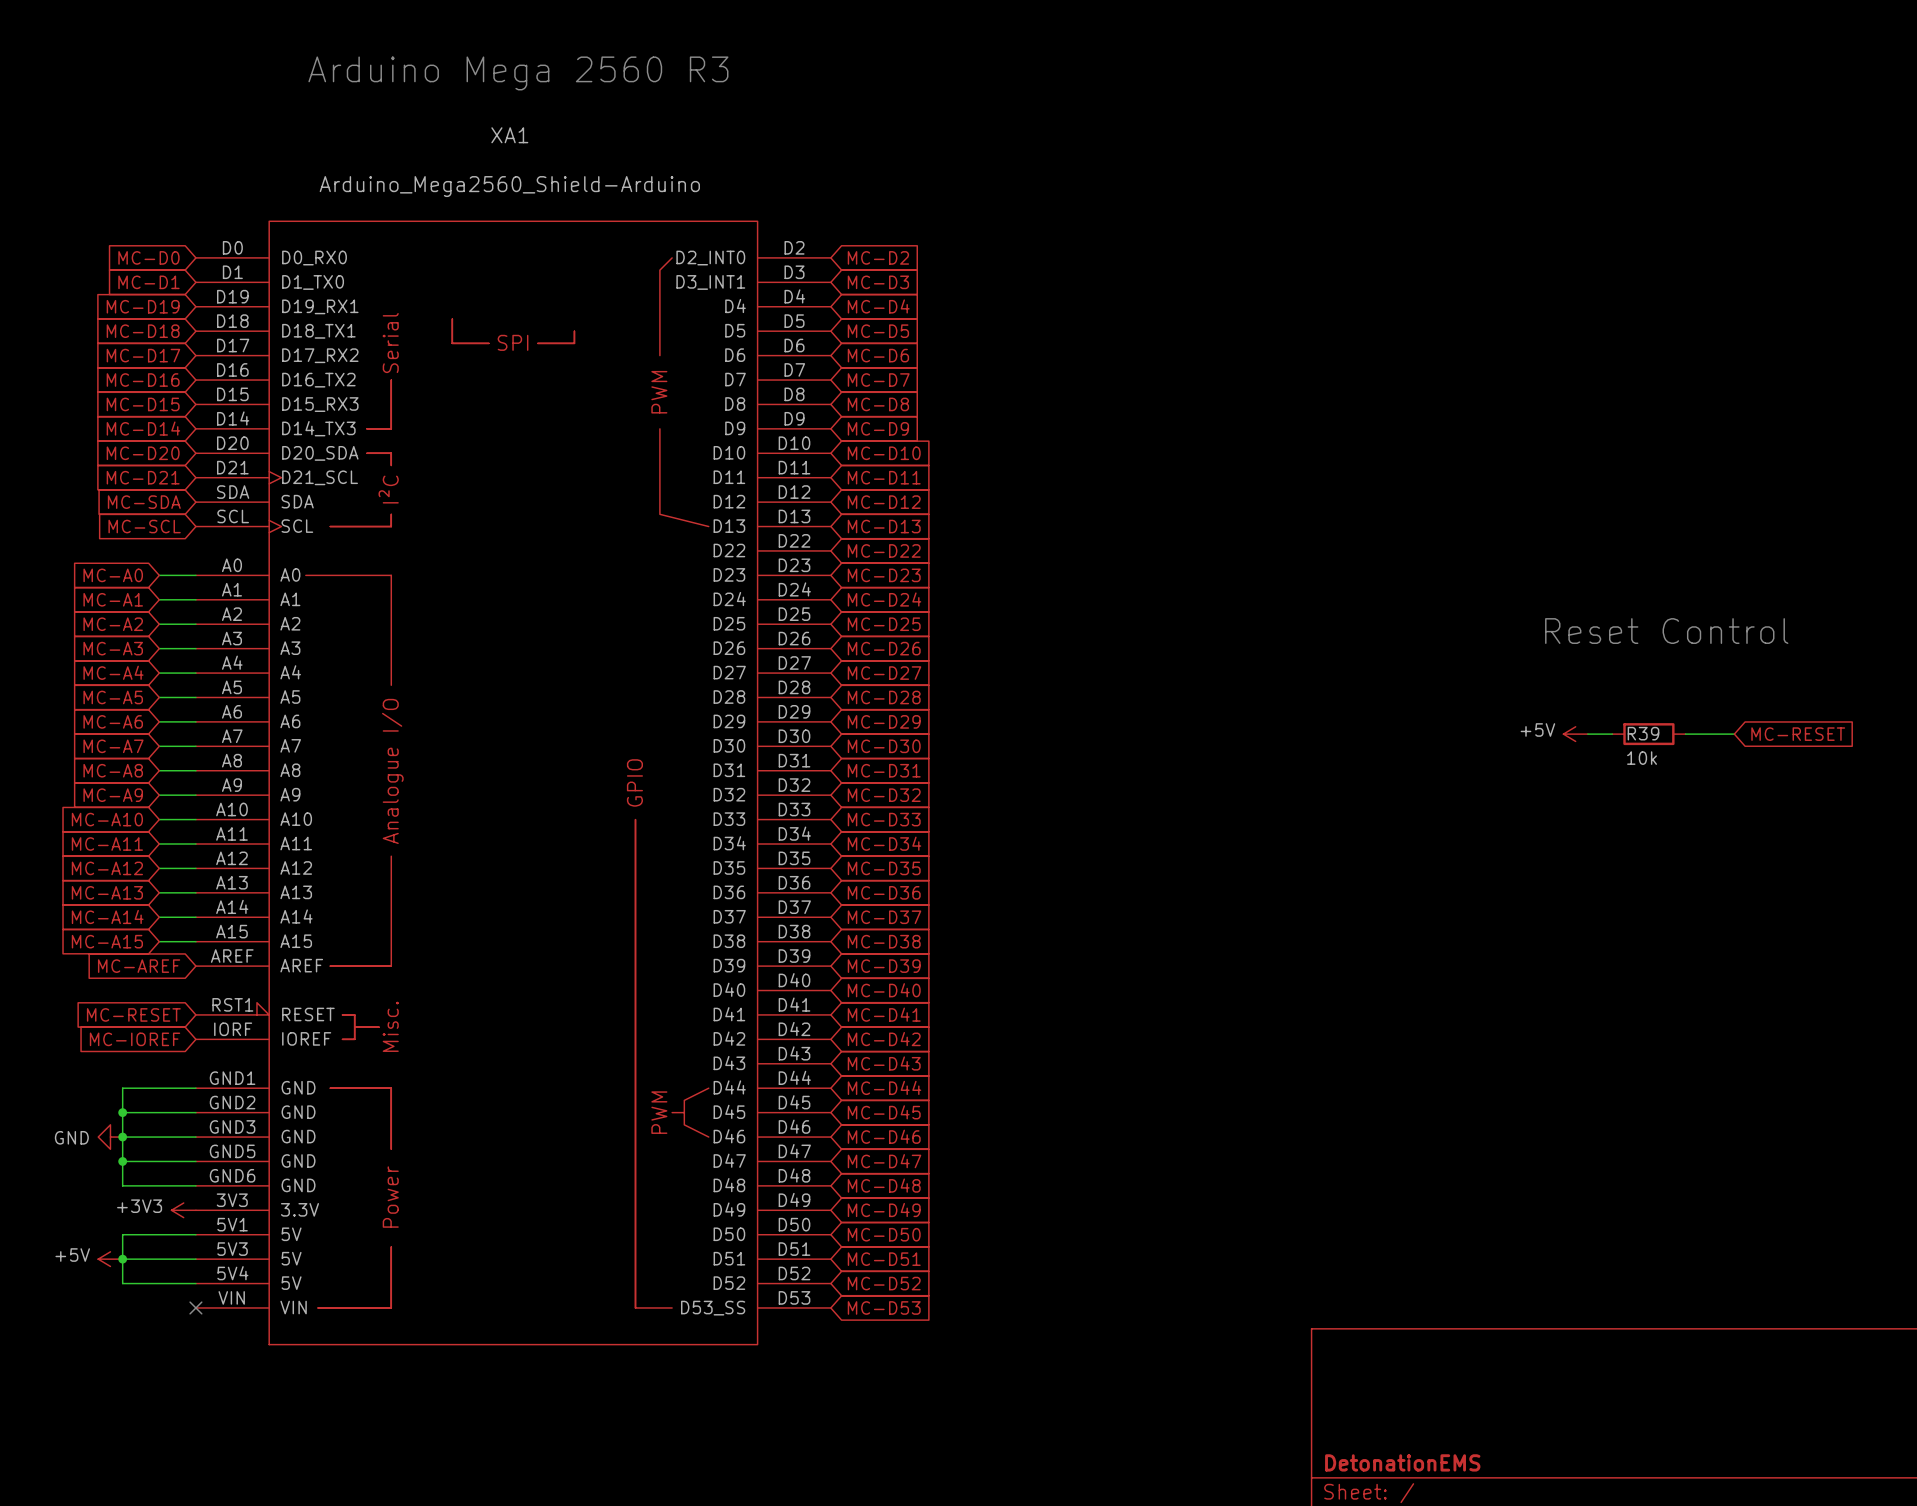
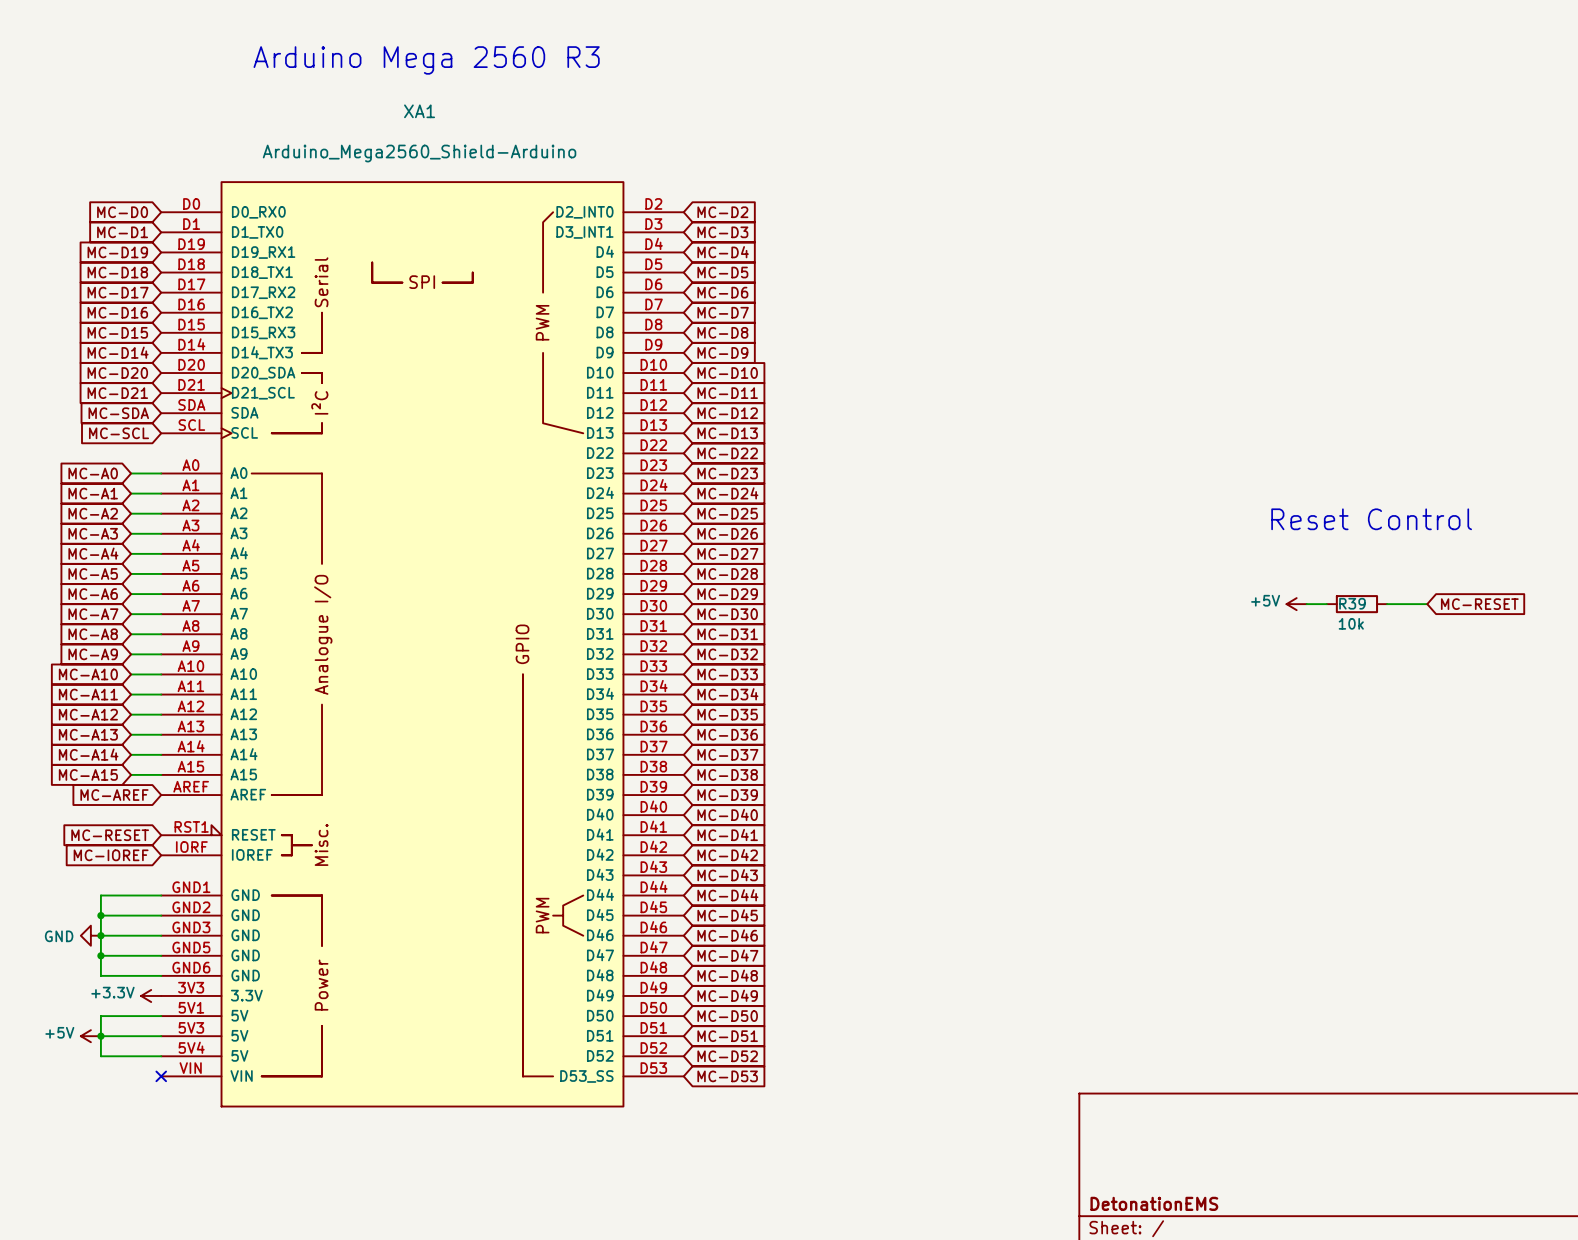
power symbol: +3V3 (183, 1210) -> +3.3V (151, 995)

